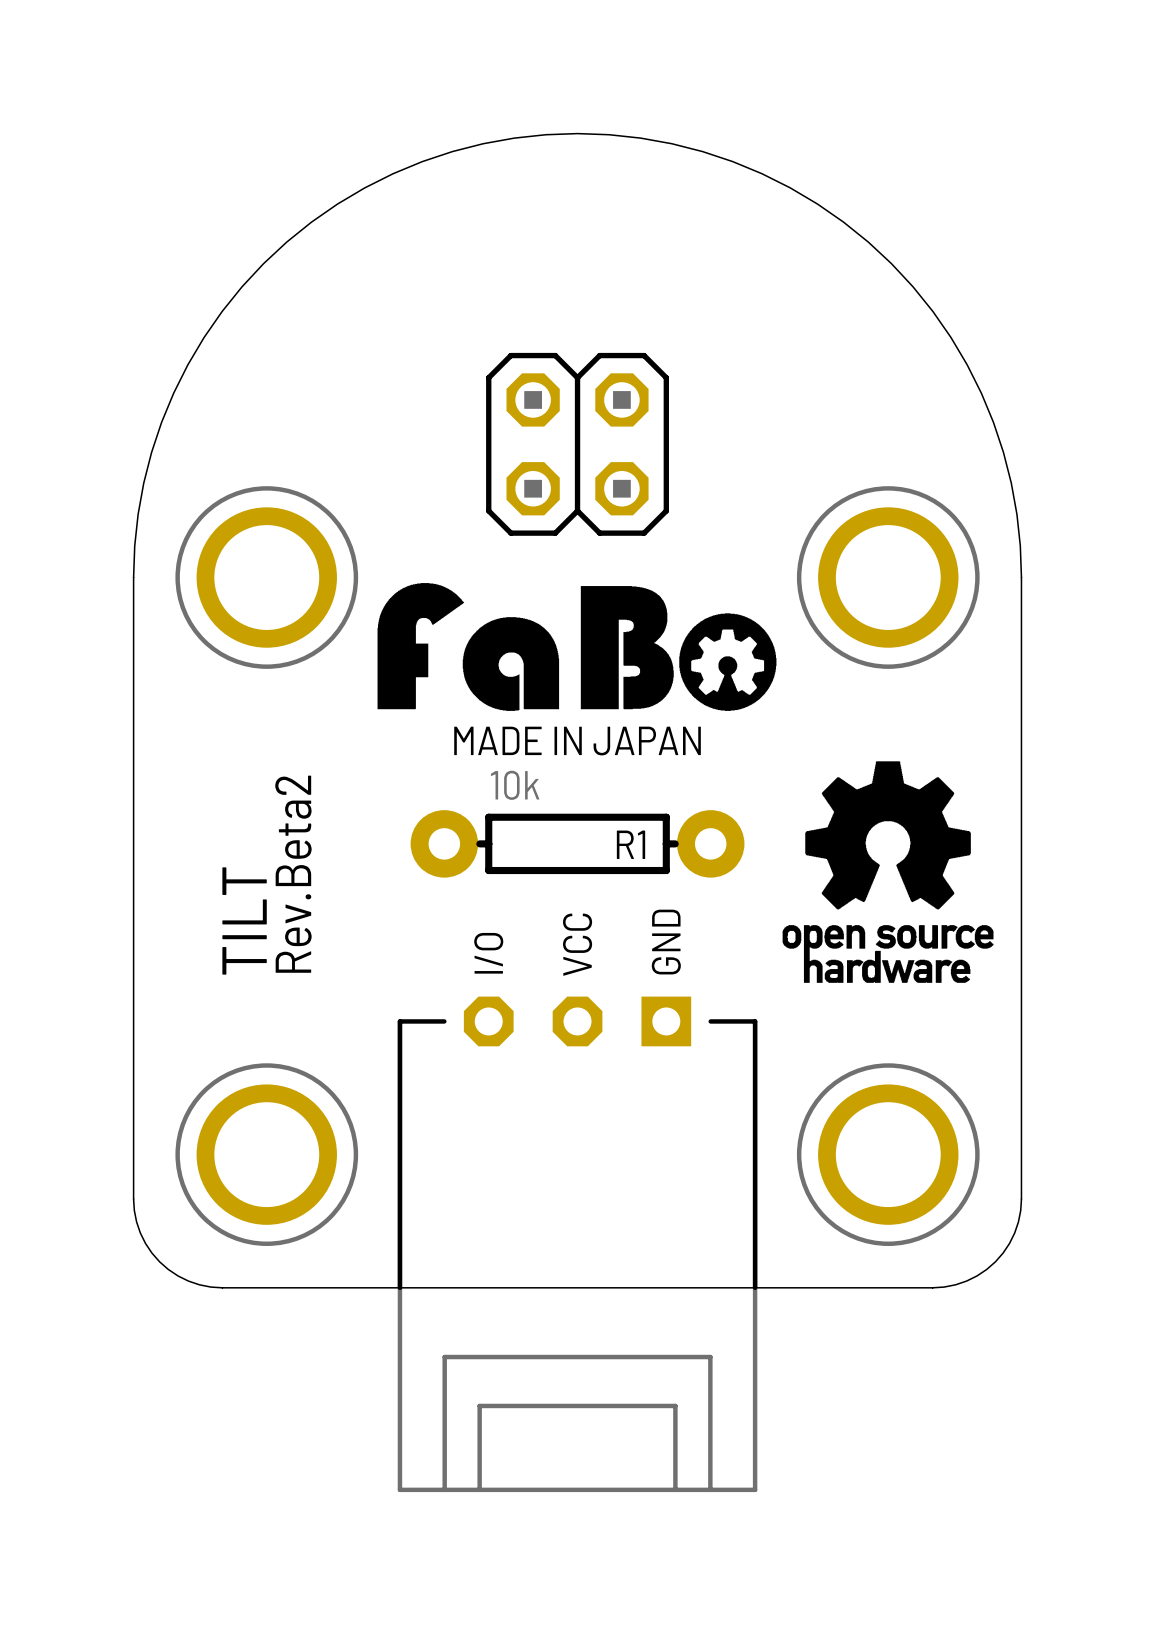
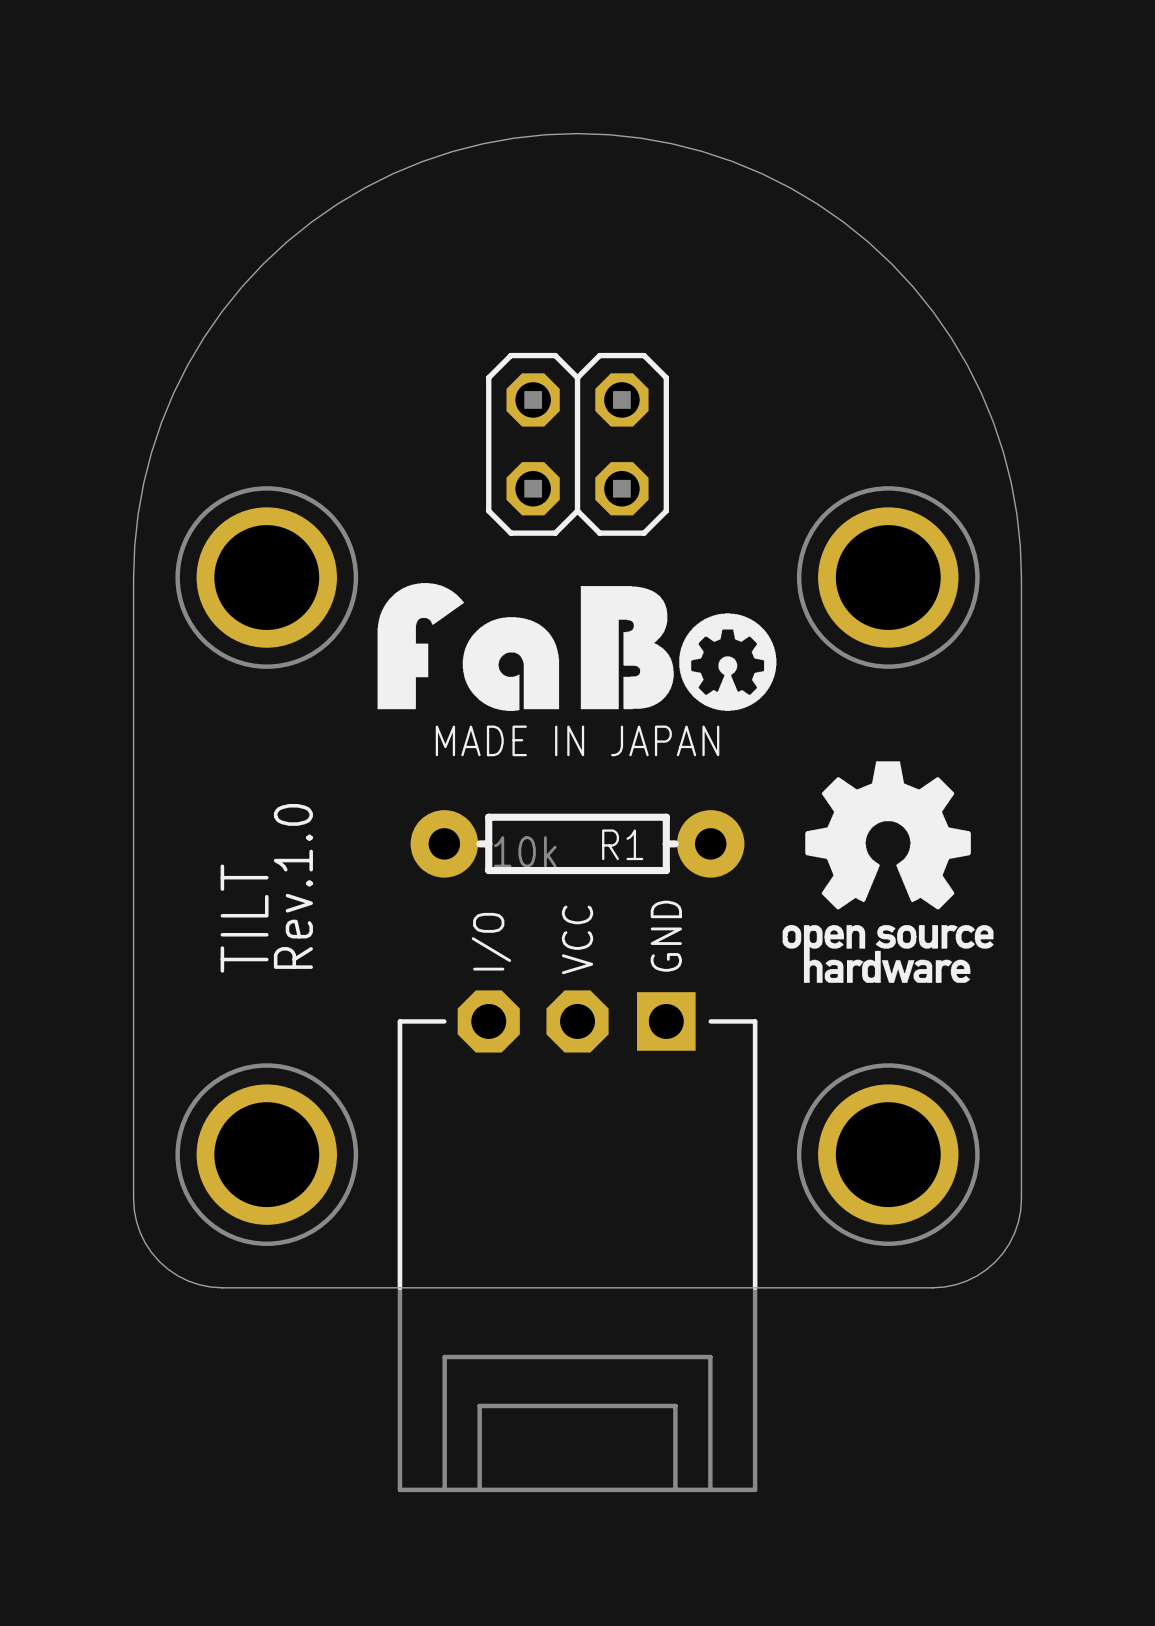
part footprint: [133, 133, 1022, 1493] -> [133, 133, 1022, 1493]
R1 value position: 10k (515, 785) -> 10k (525, 851)
text: Rev.Beta2 (293, 874) -> Rev.1.0 (293, 886)

